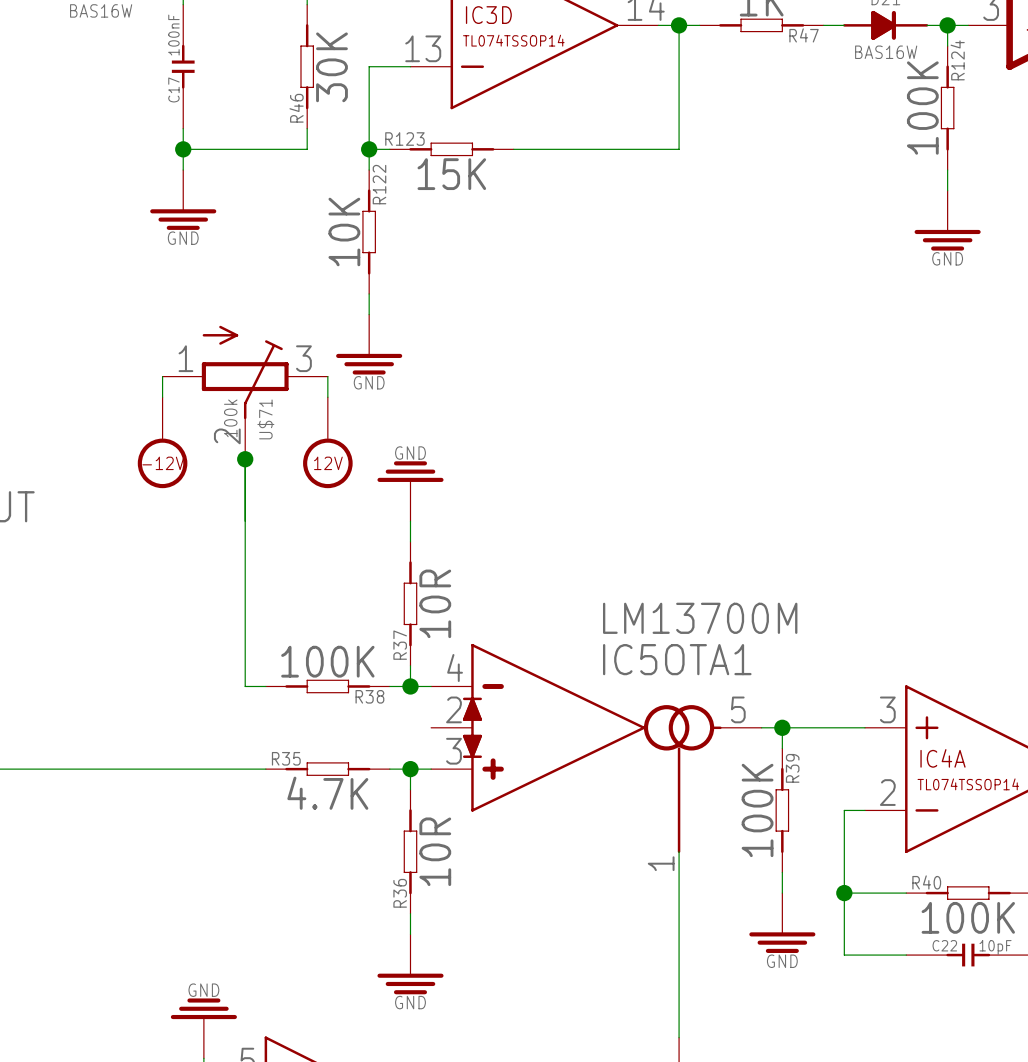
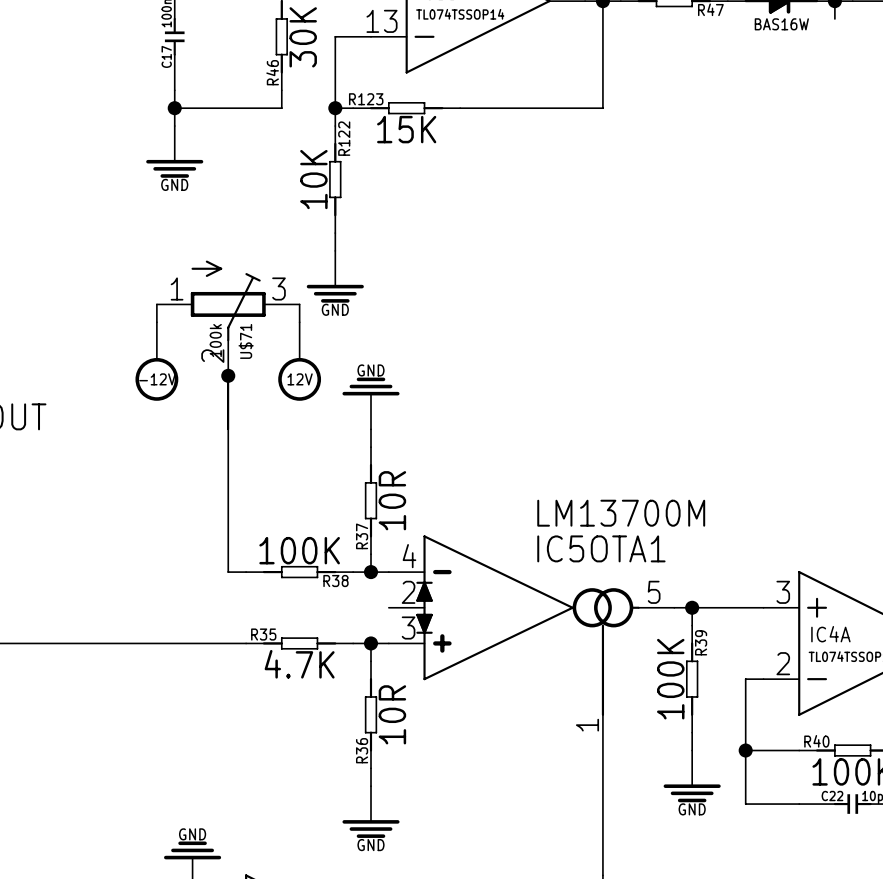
R124: 100K (947, 108) -> none
wire: (947, 170) (947, 190) -> none
power symbol: GND (947, 220) -> none

